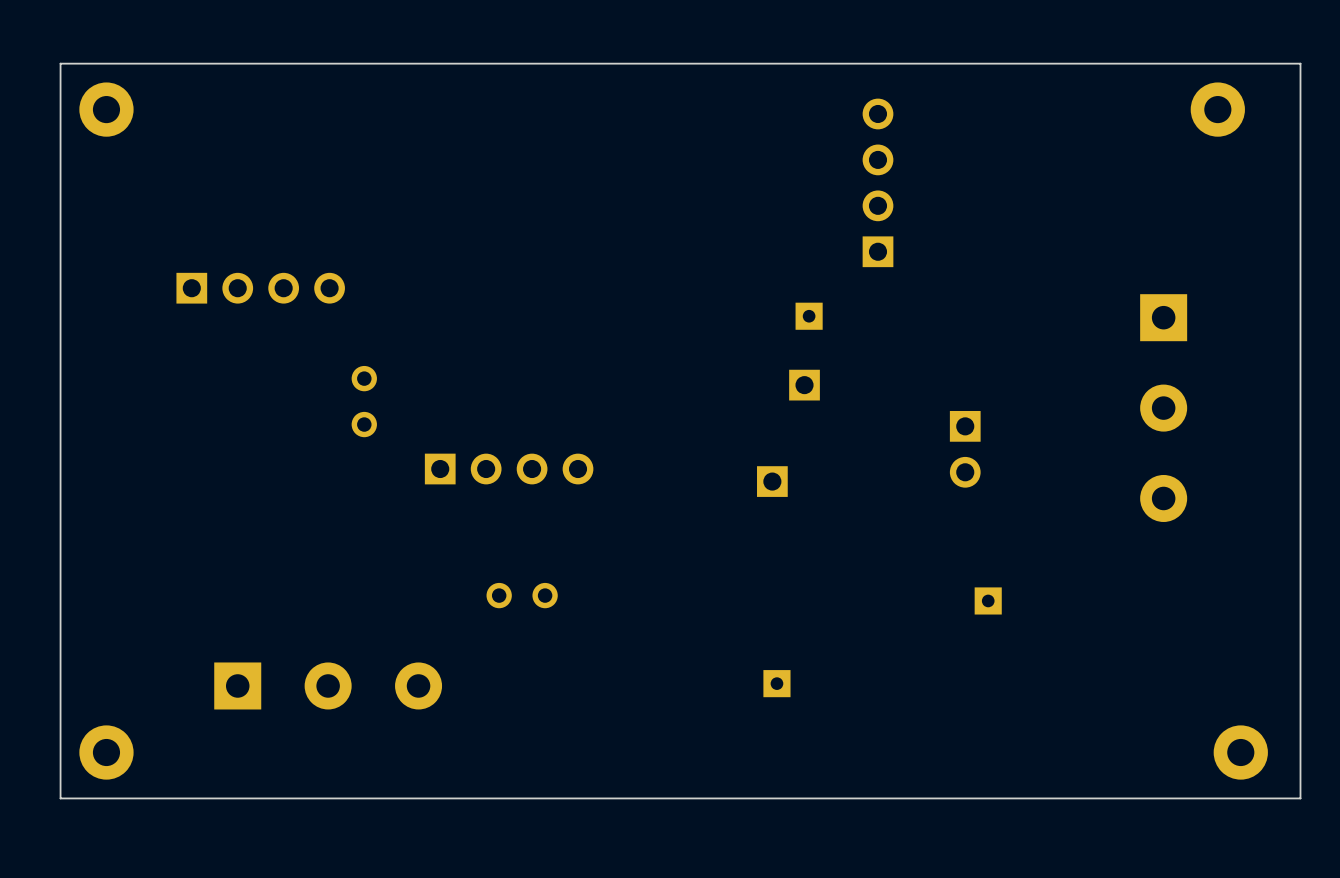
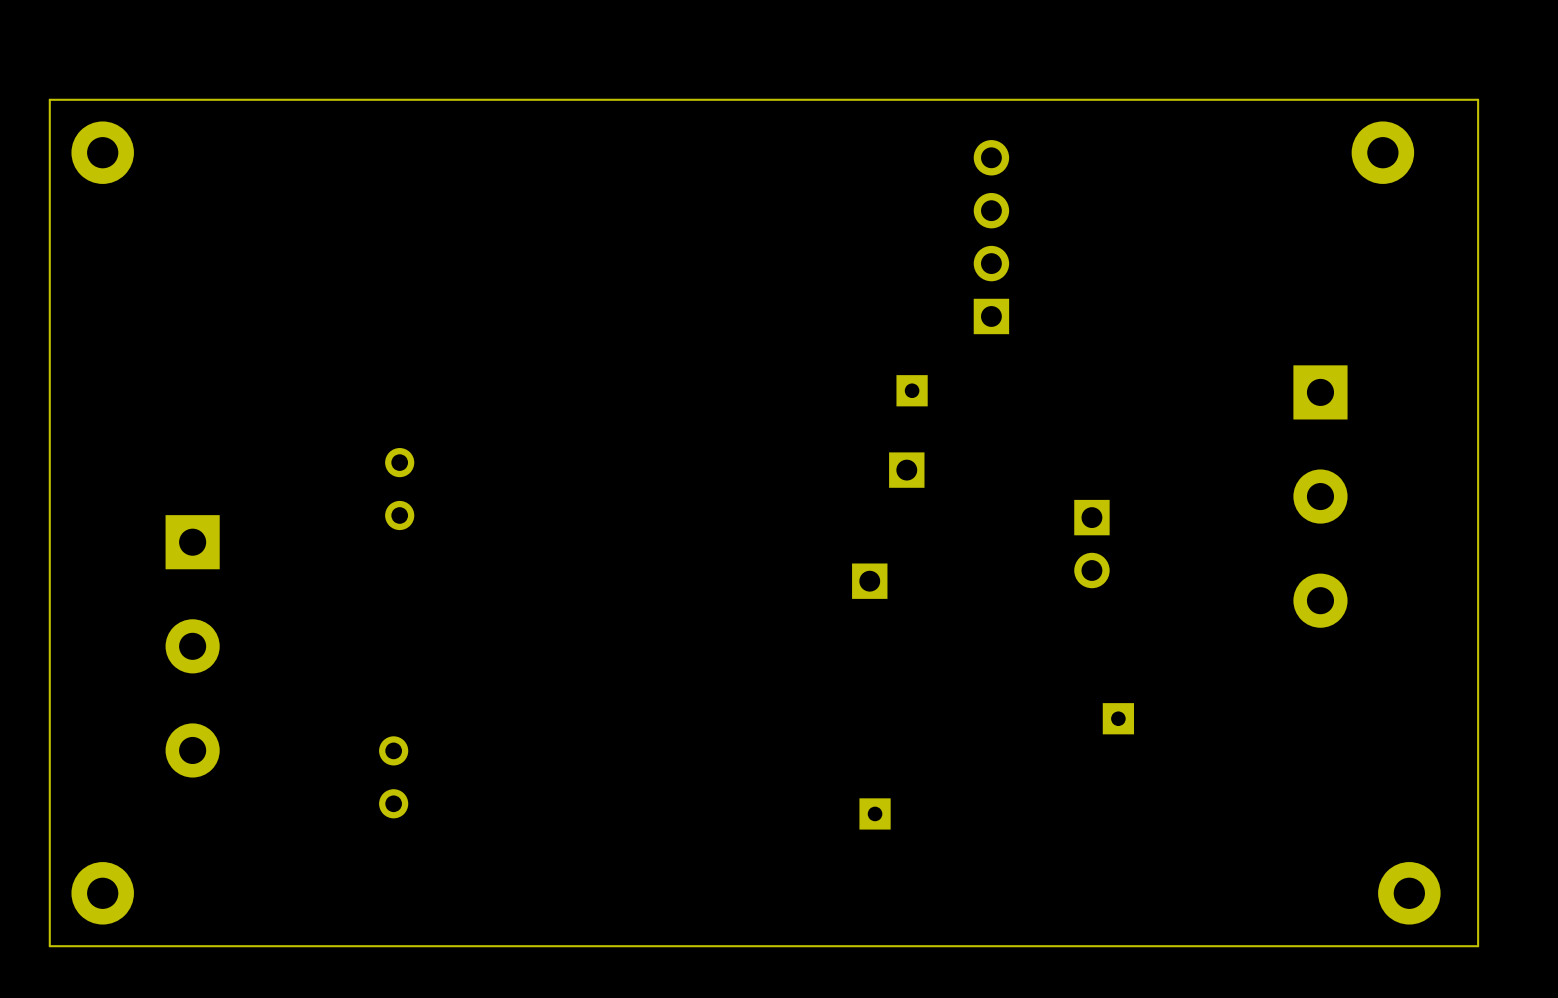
part: (260, 288) -> none
part: (509, 469) -> none
part rotation: 0° (522, 595) -> 90° clockwise (393, 777)
part position: (522, 595) -> (393, 777)
part rotation: 0° (328, 685) -> 90° clockwise (192, 646)
part position: (328, 685) -> (192, 646)

